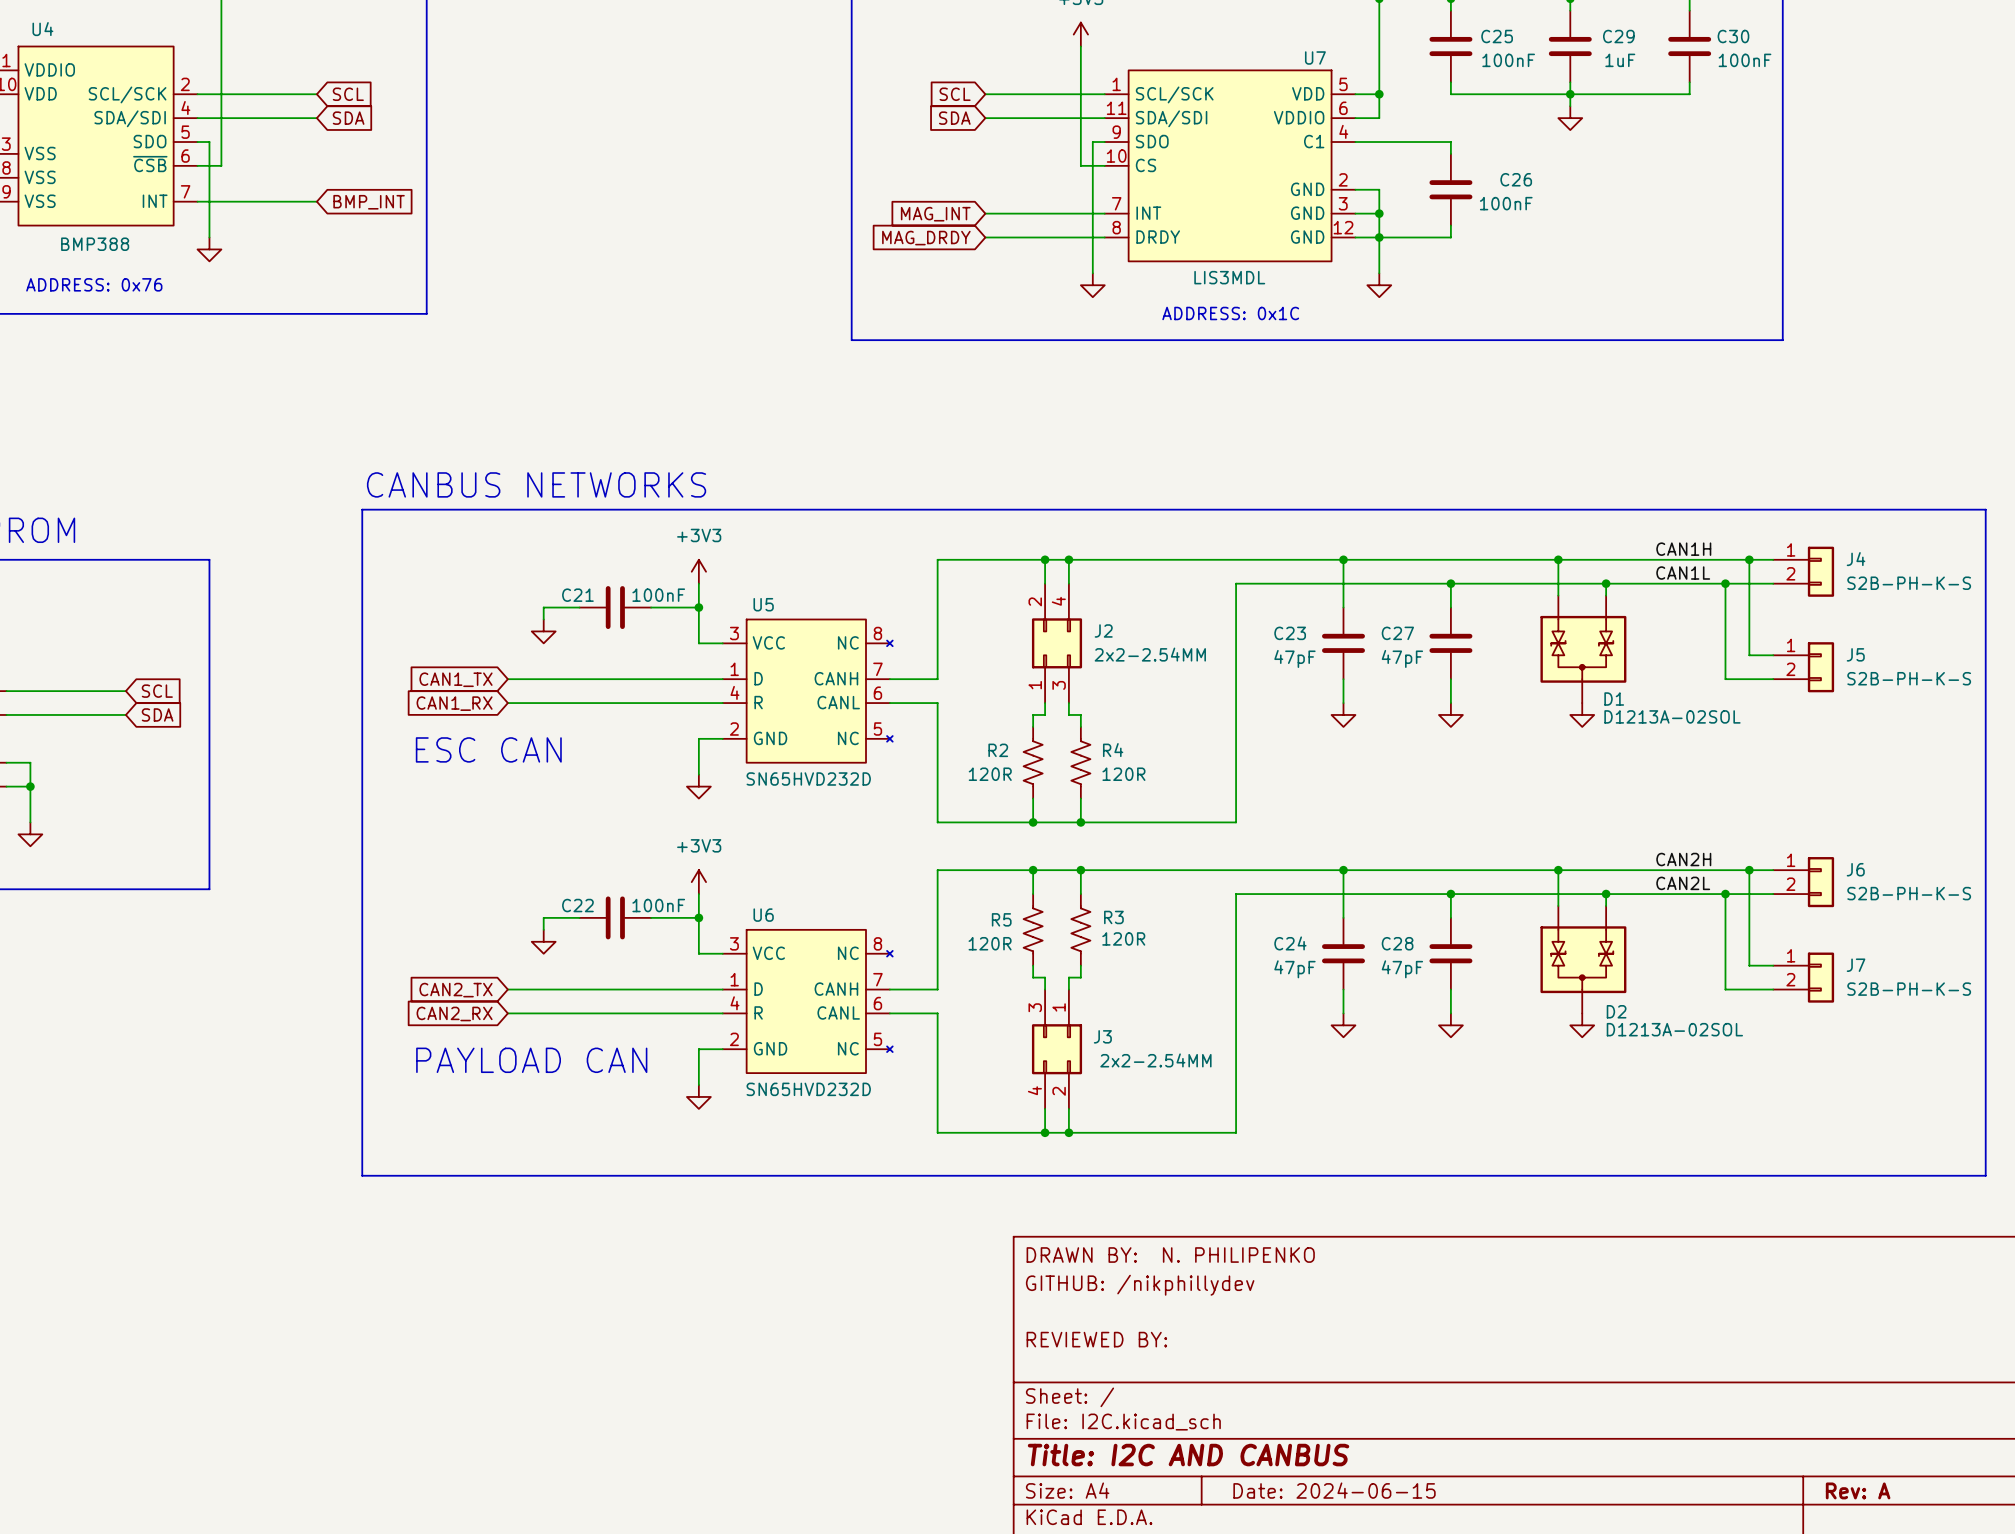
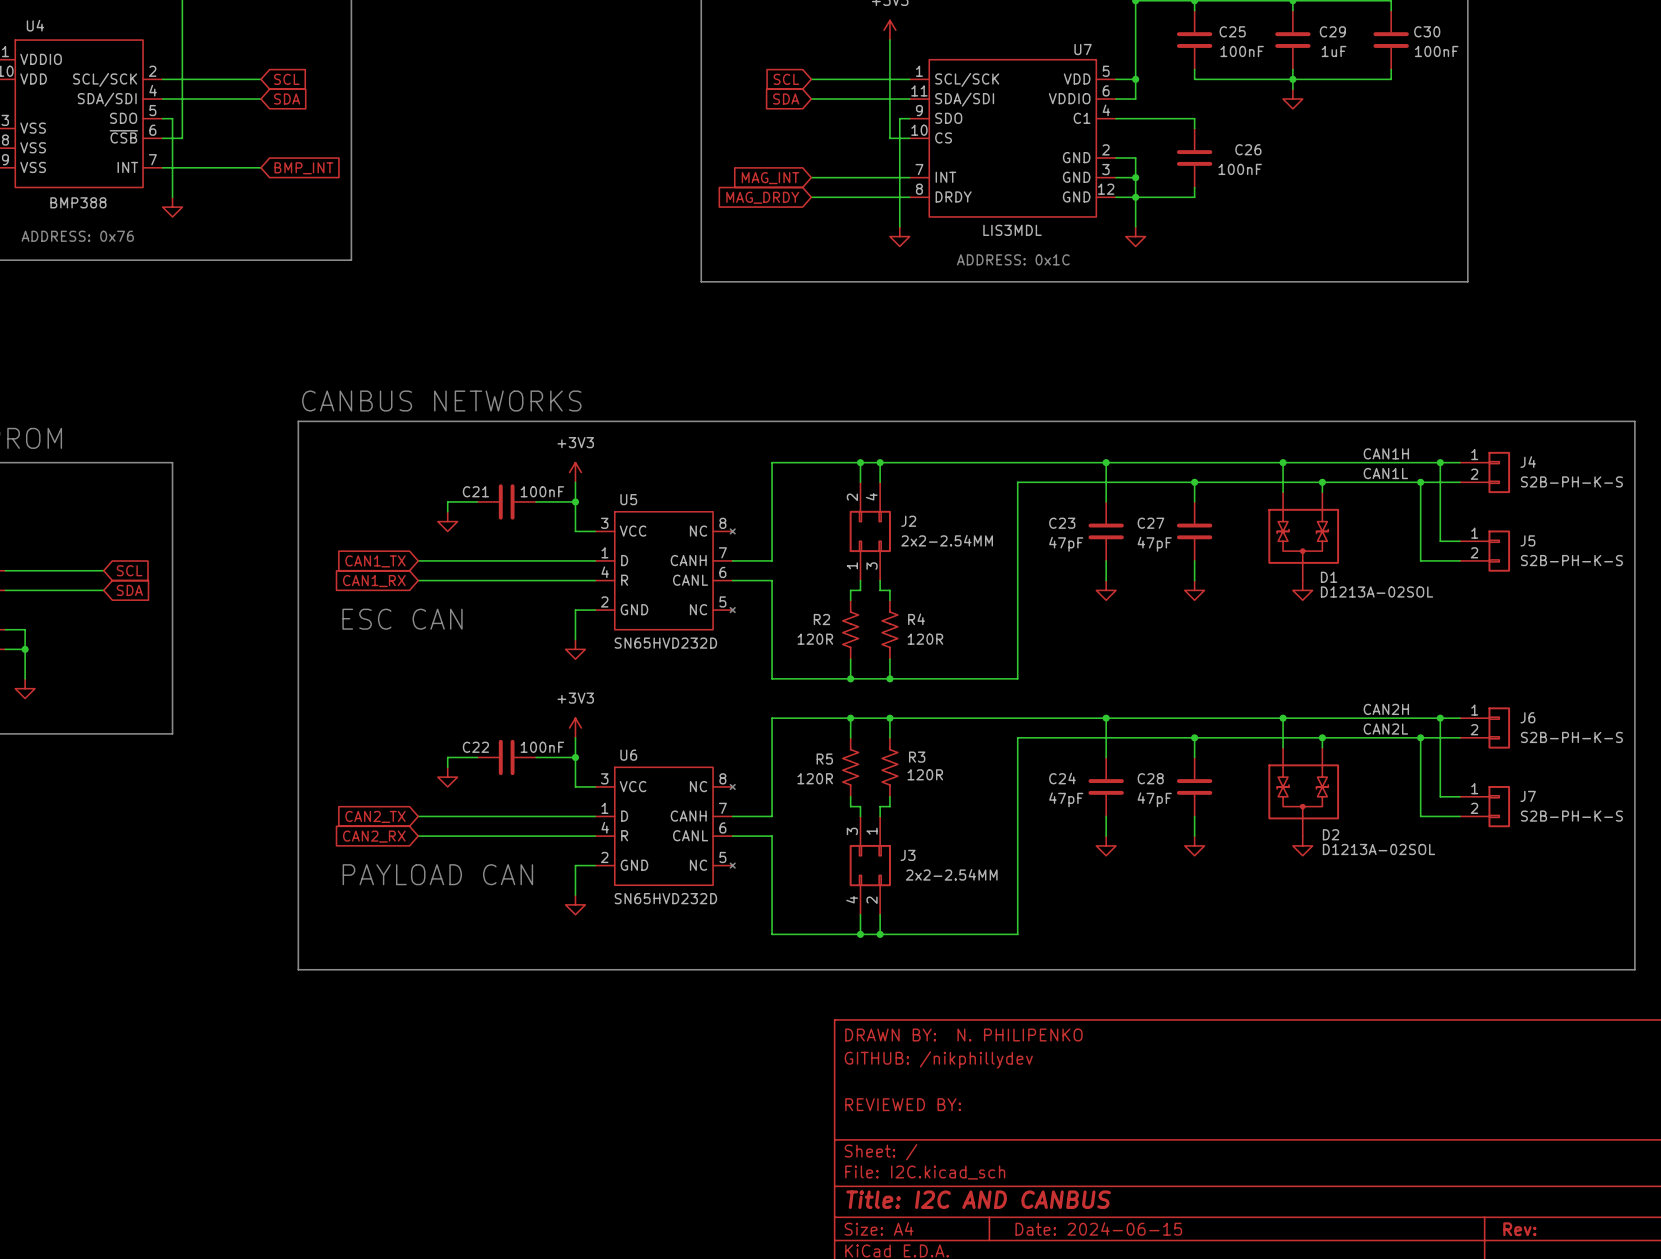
title block: Rev: A (1858, 1490) -> Rev: (1519, 1229)

